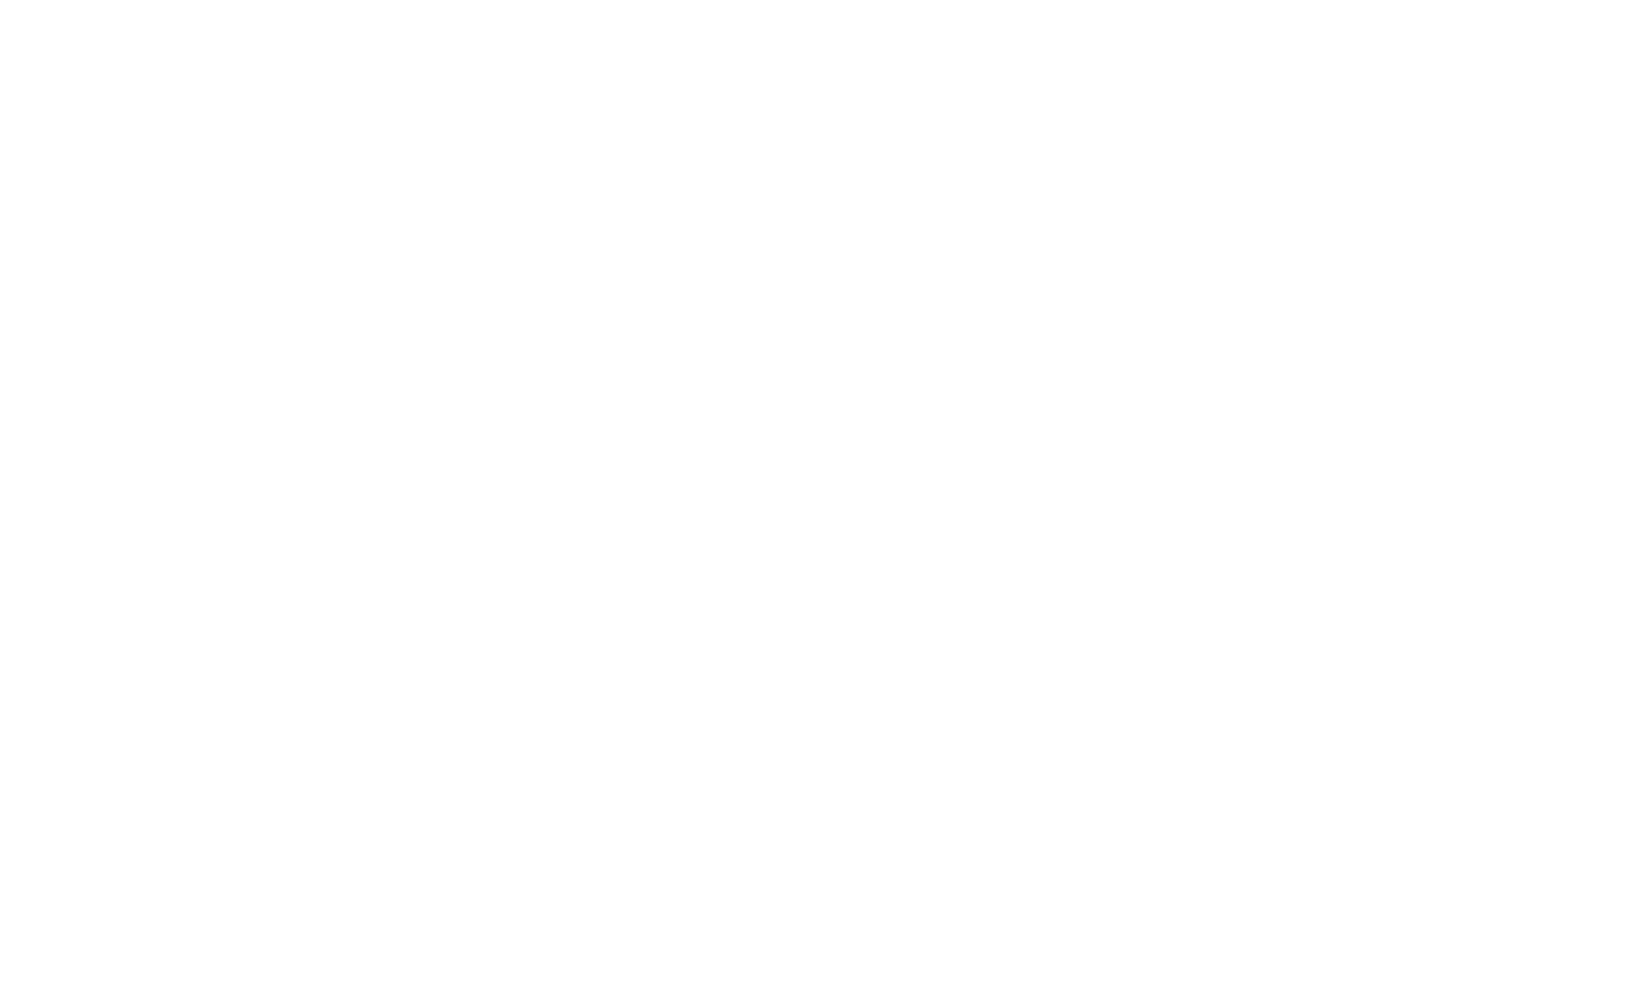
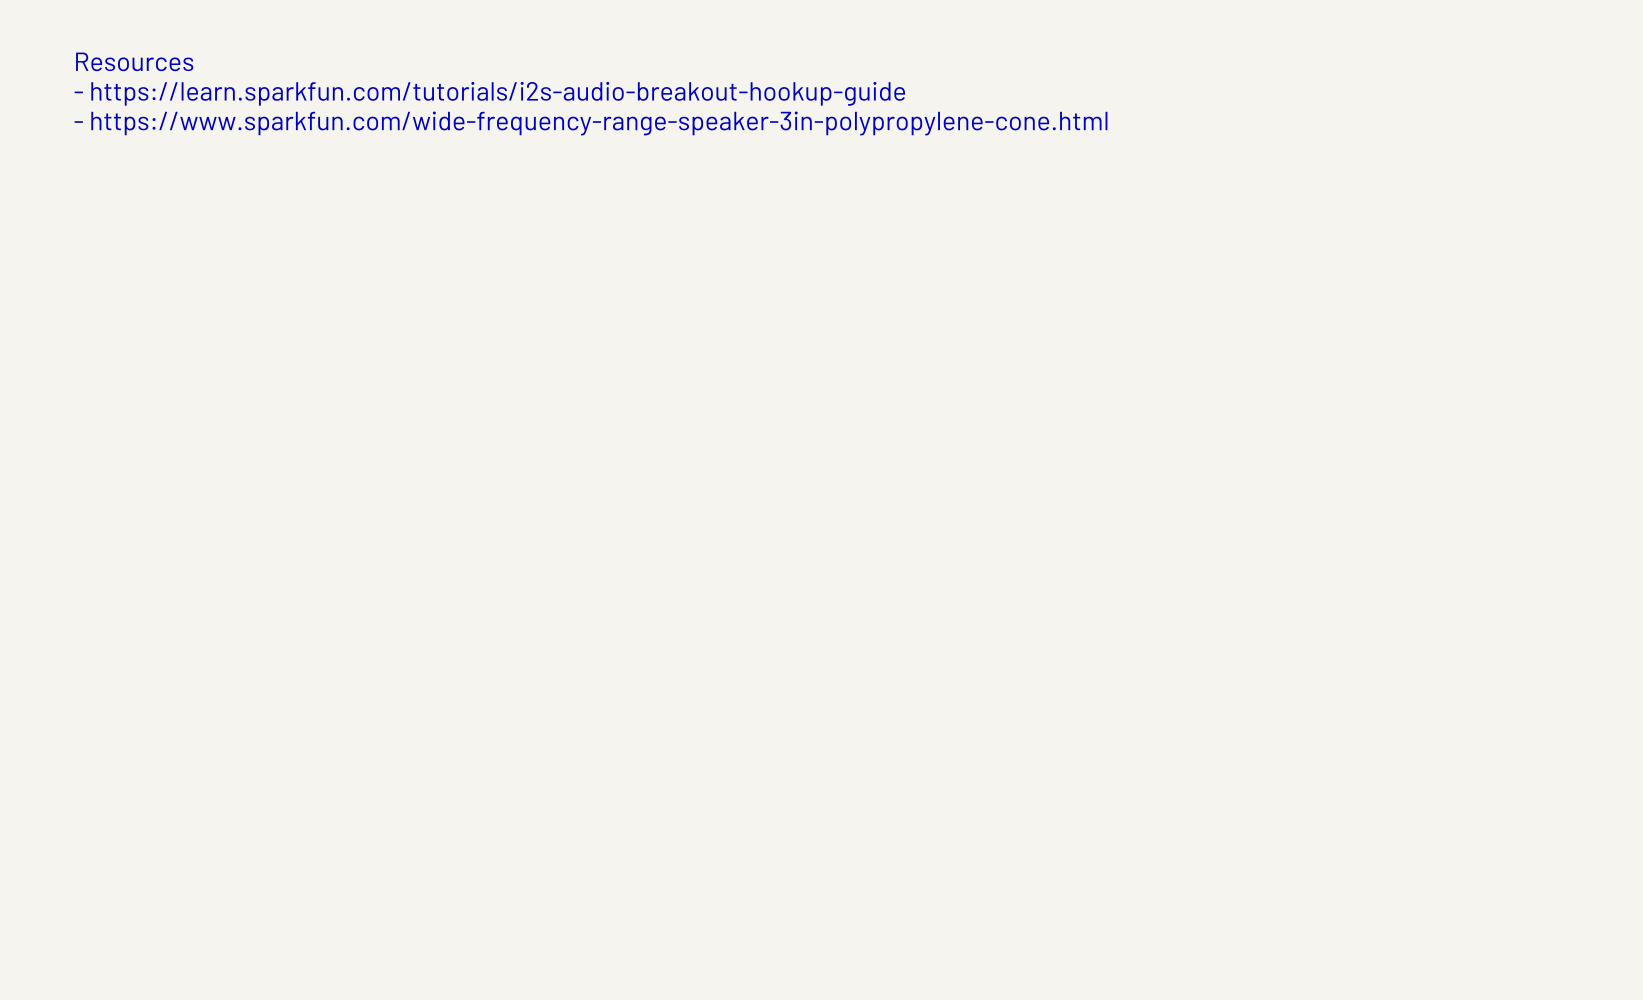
text: none -> Resources (134, 61)
text: none -> - https://learn.sparkfun.com/tutorials/i2s-audio-breakout-hookup-guide (489, 93)
text: none -> - https://www.sparkfun.com/wide-frequency-range-speaker-3in-polypropylene-cone.html (591, 123)

